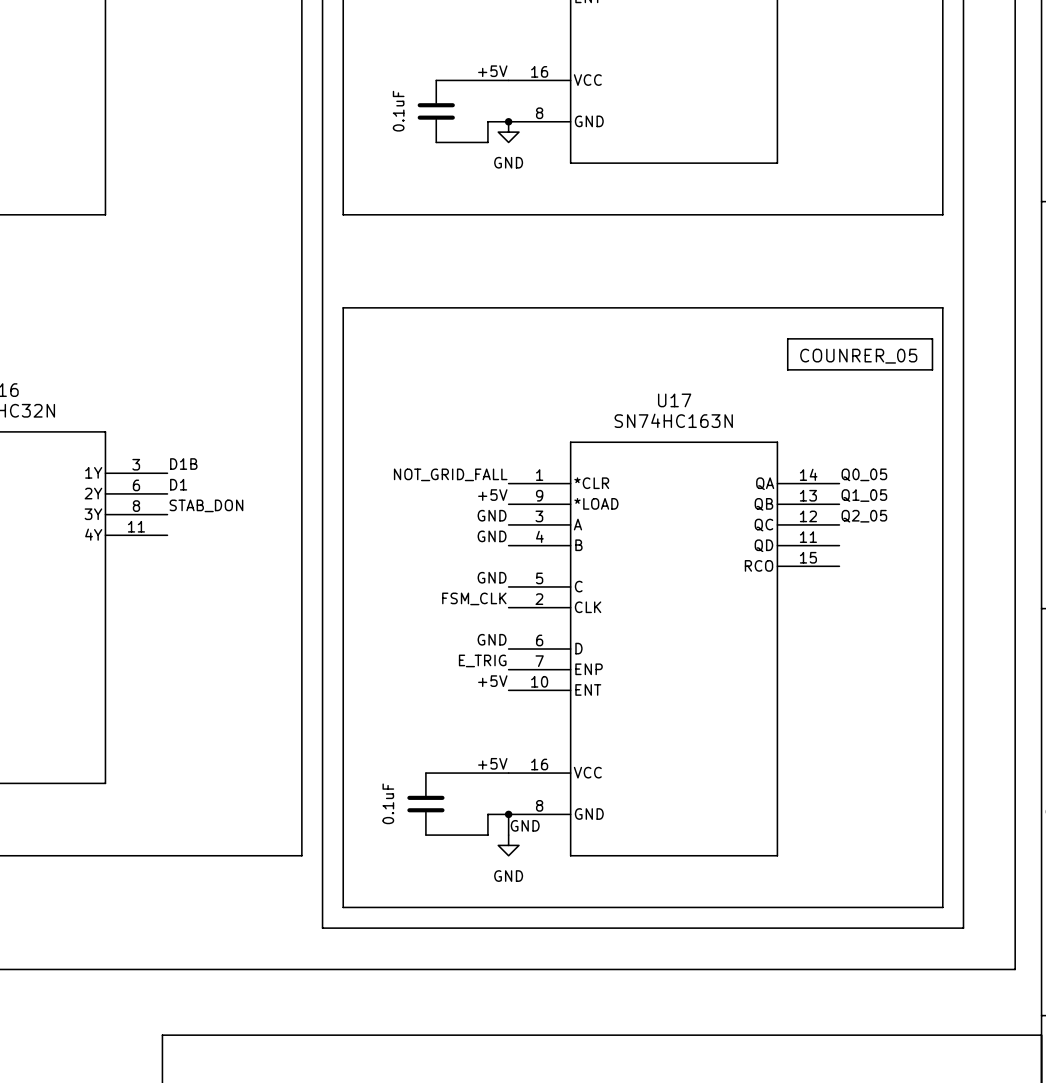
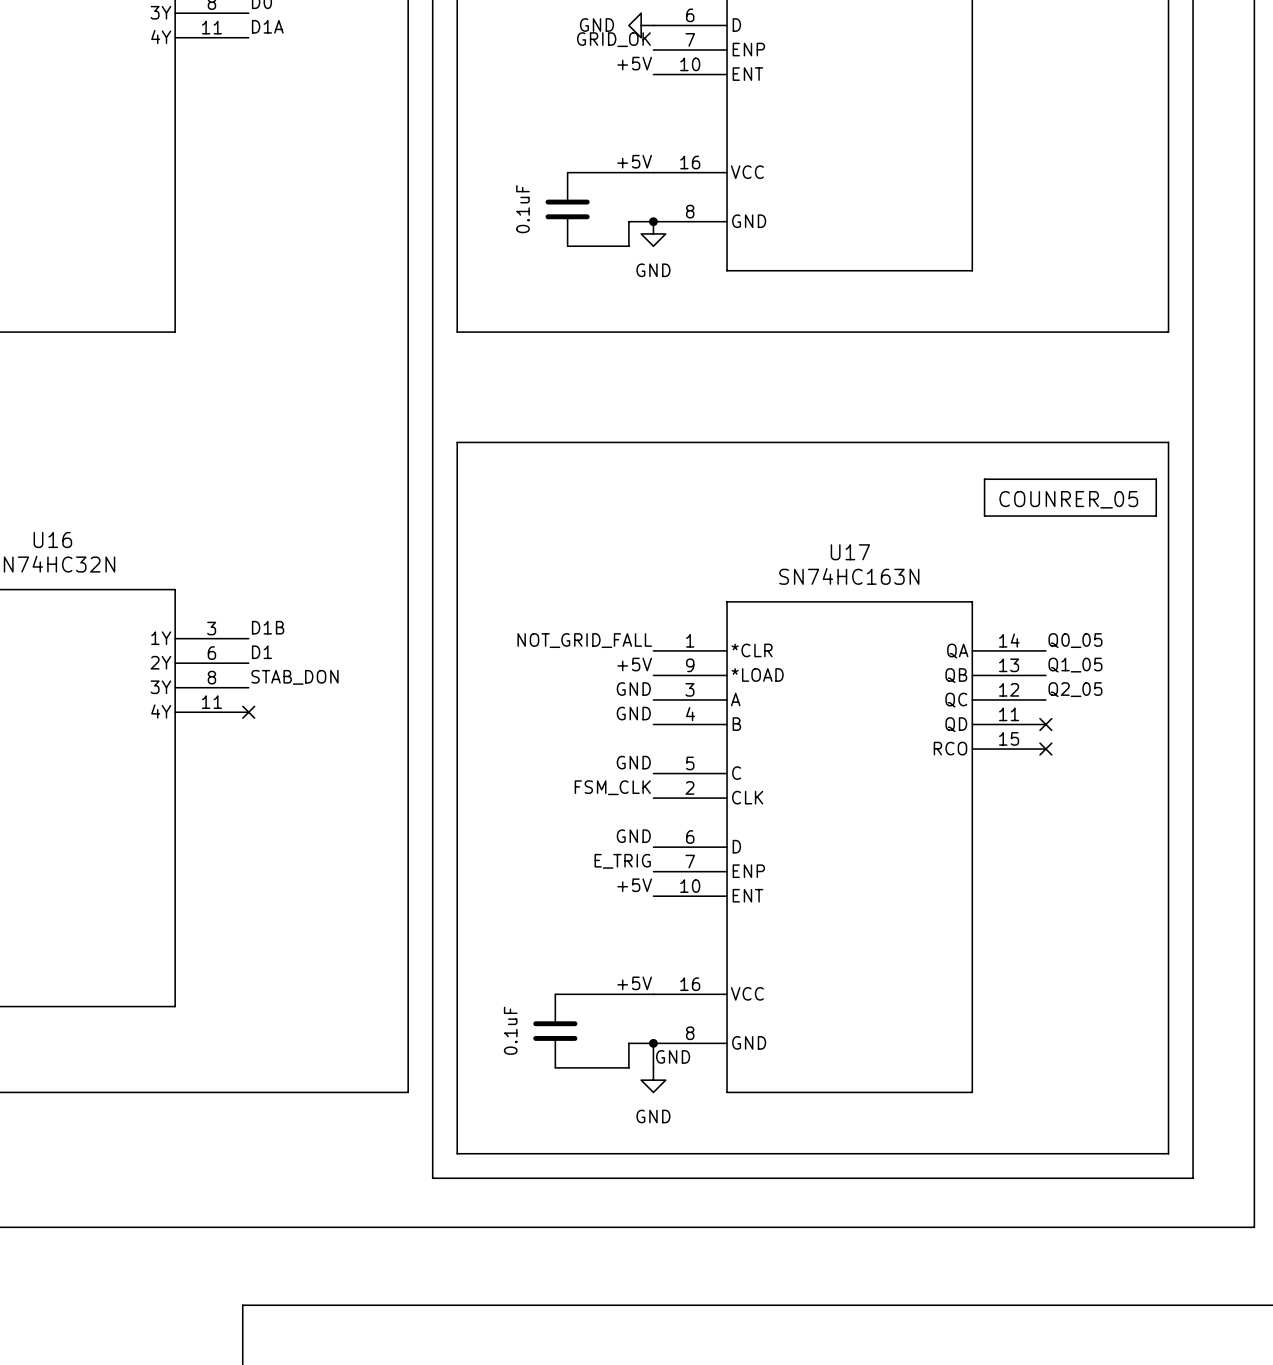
no-connect mark: none -> (248, 712)
no-connect mark: none -> (1045, 724)
no-connect mark: none -> (1045, 749)

